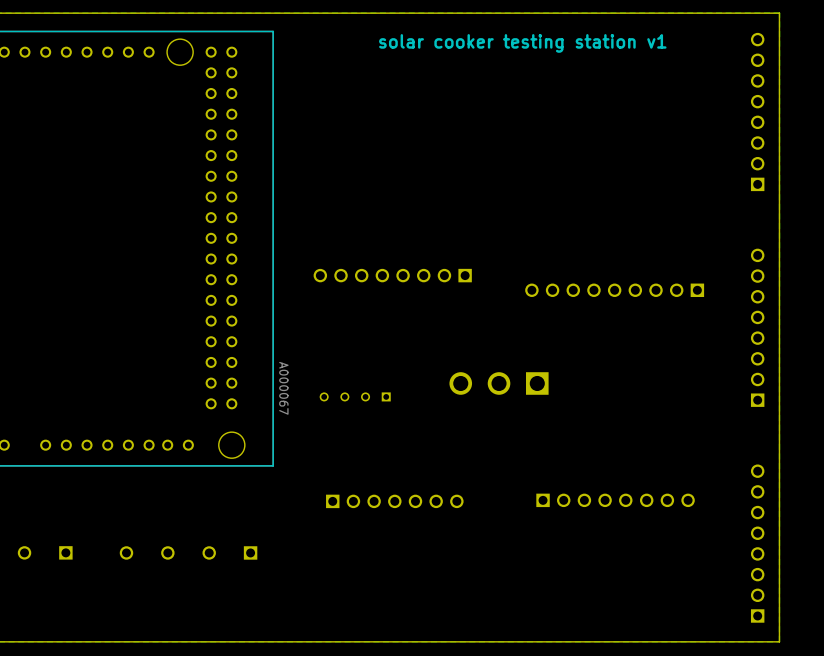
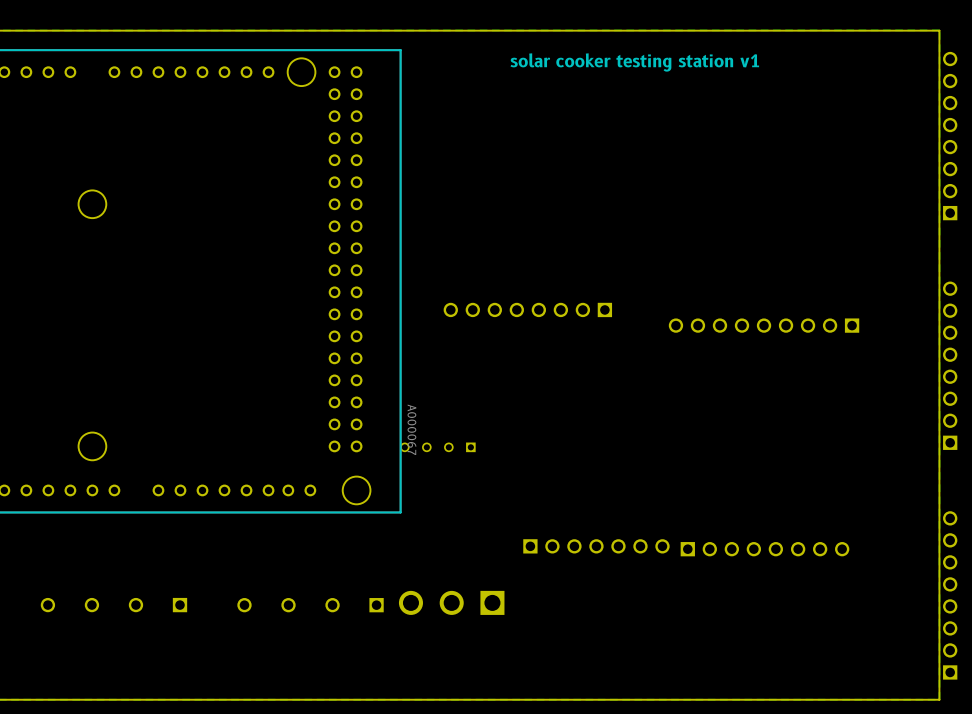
part position: (757, 111) -> (950, 136)
part position: (757, 327) -> (950, 365)
part: (499, 383) -> none
part position: (355, 396) -> (437, 447)
part position: (394, 501) -> (596, 546)
part position: (757, 543) -> (950, 595)
part: none -> (451, 602)

